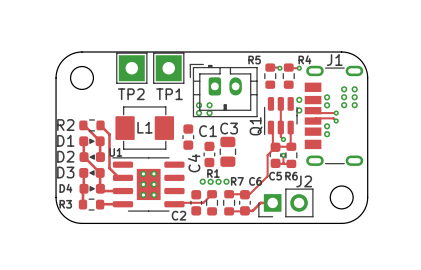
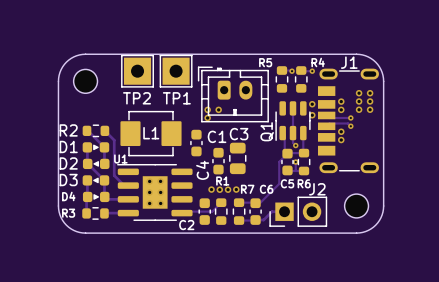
via: (209, 113) -> none

